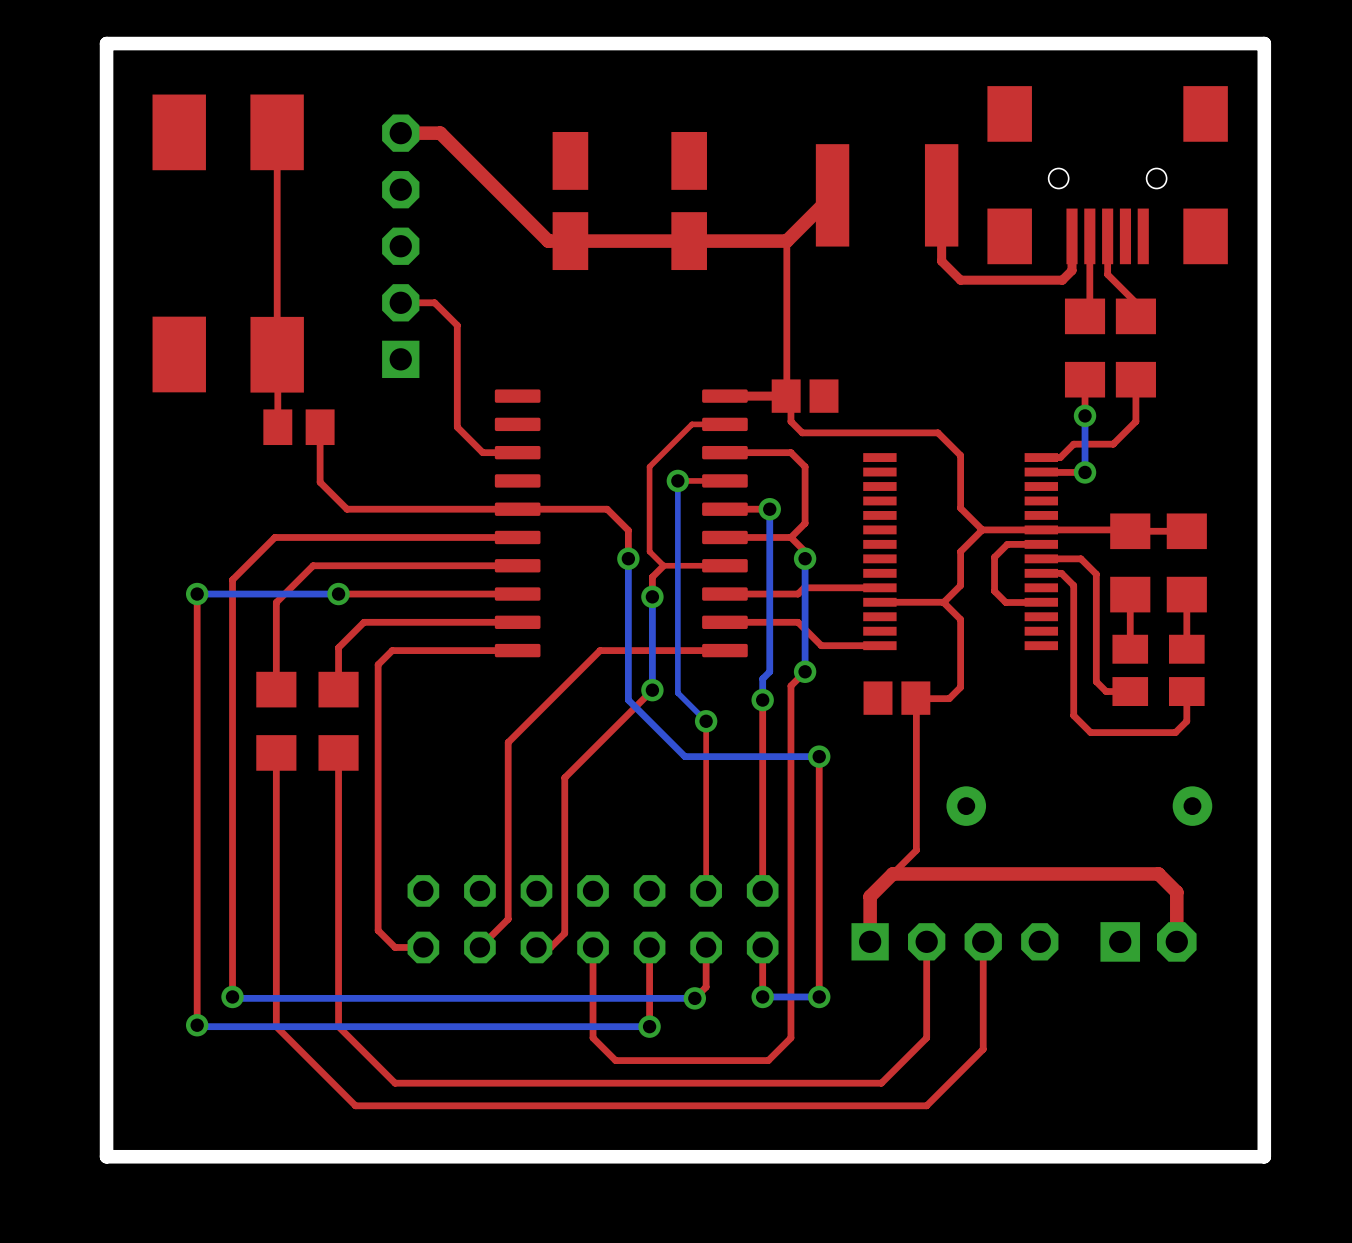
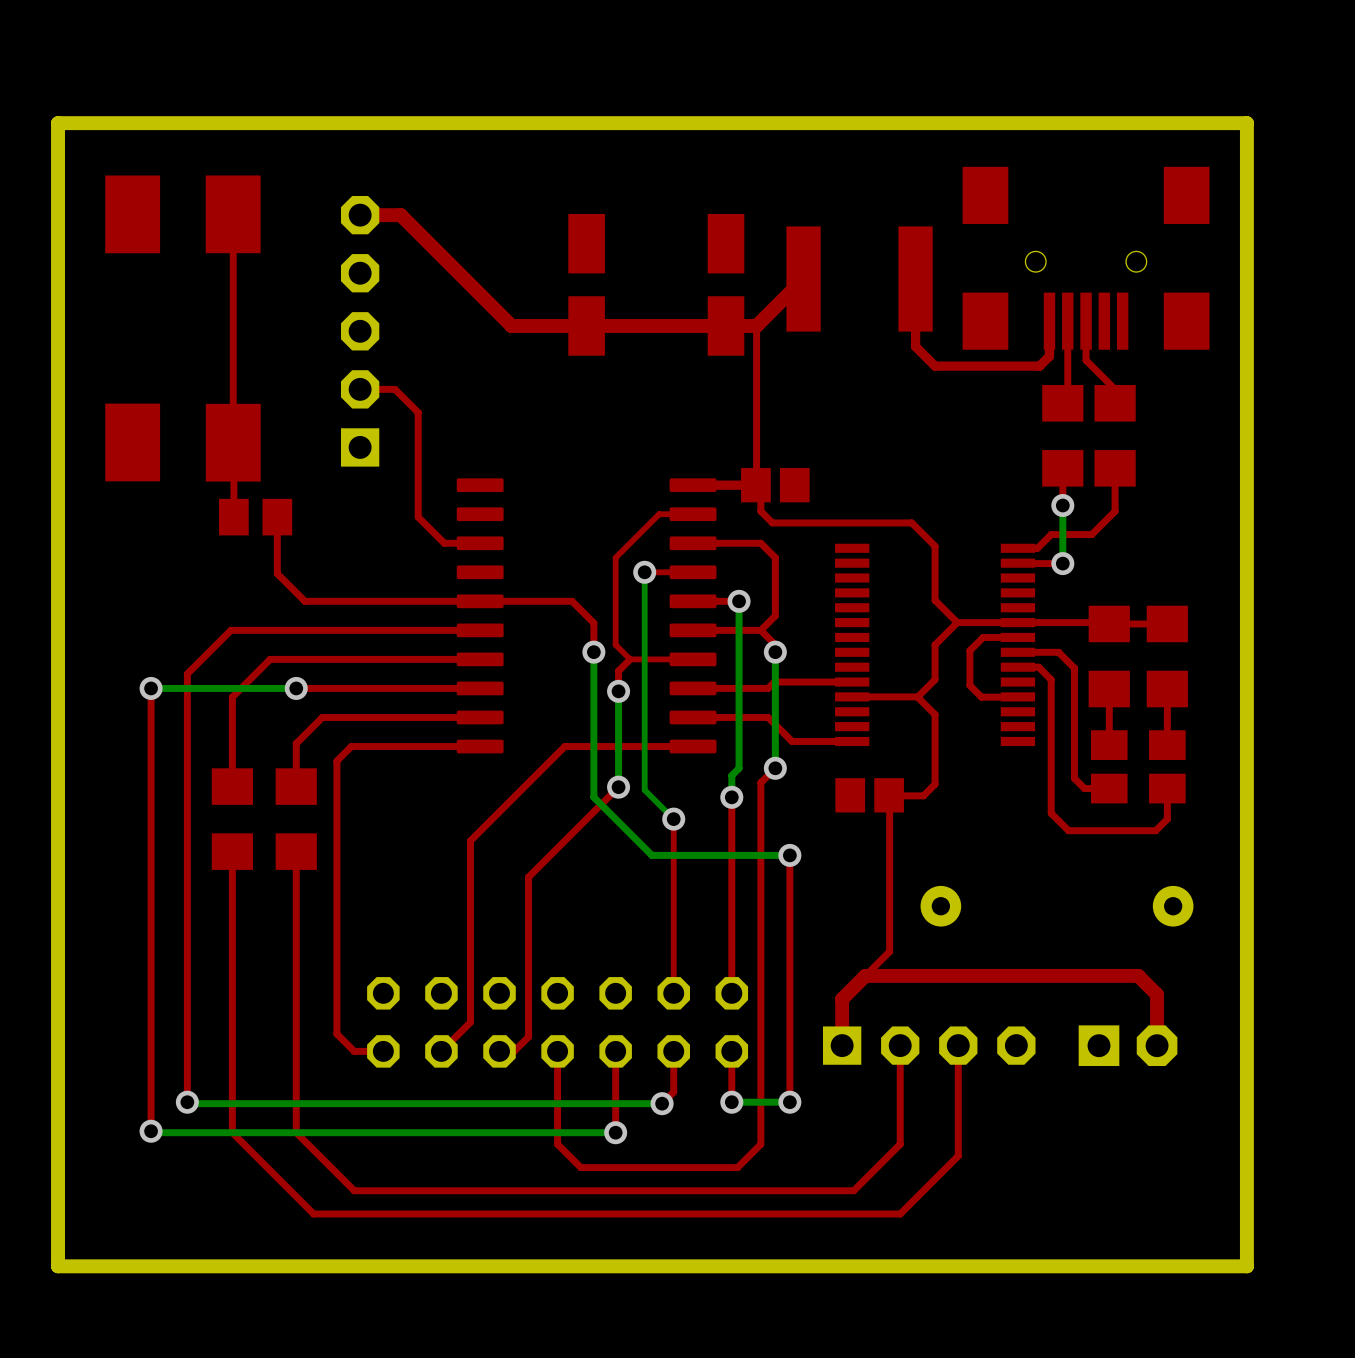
part: (570, 201) -> none
part: none -> (586, 284)
part: (689, 201) -> none
part: none -> (726, 284)

